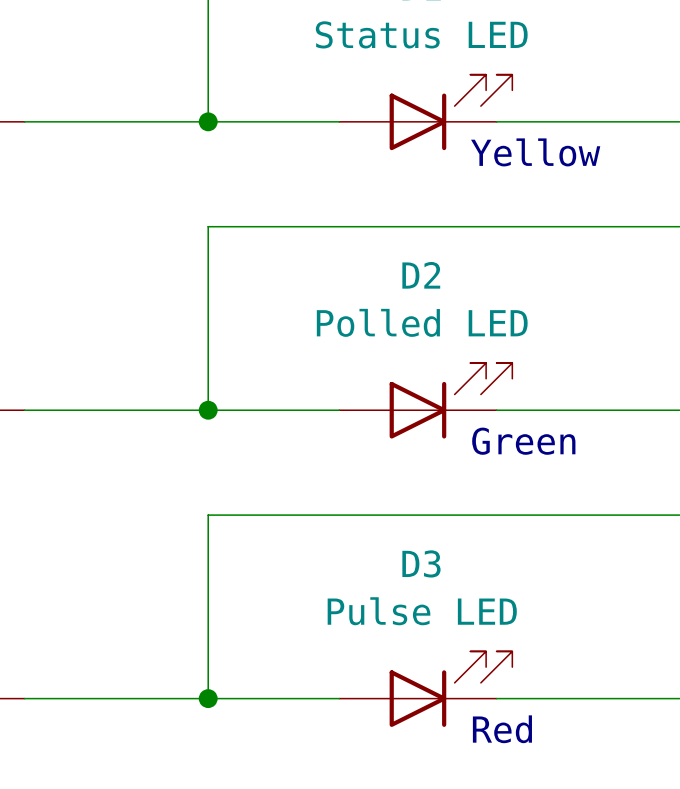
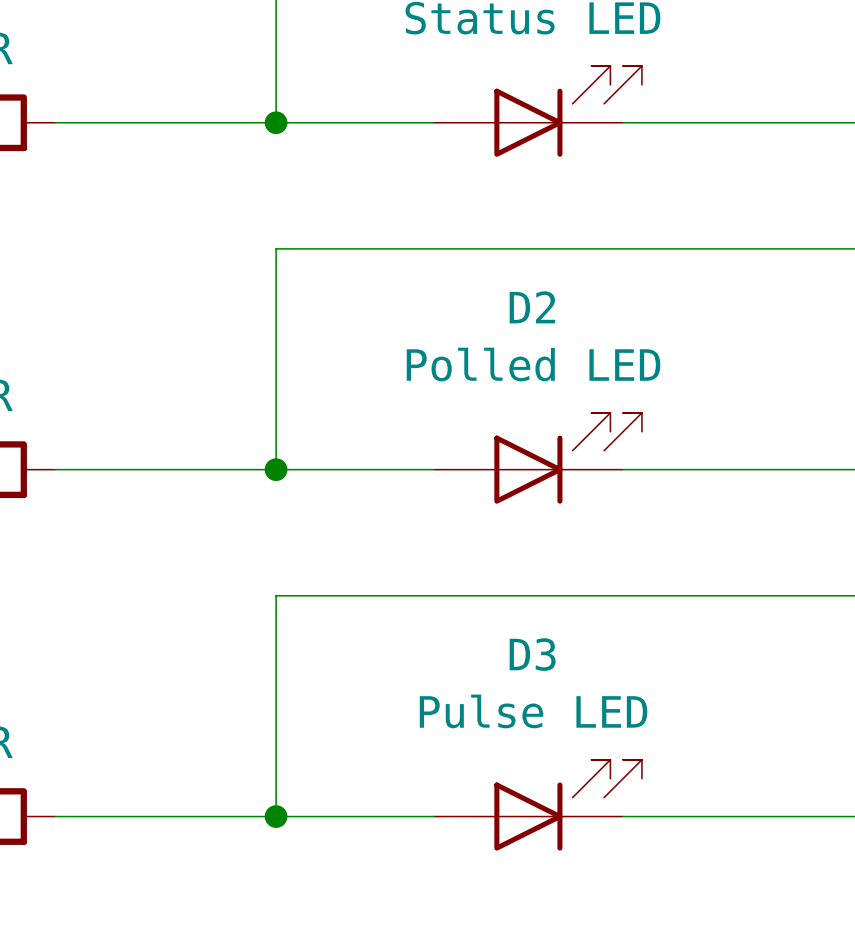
text: Yellow (535, 152) -> none
text: Green (523, 441) -> none
text: Red (502, 729) -> none

